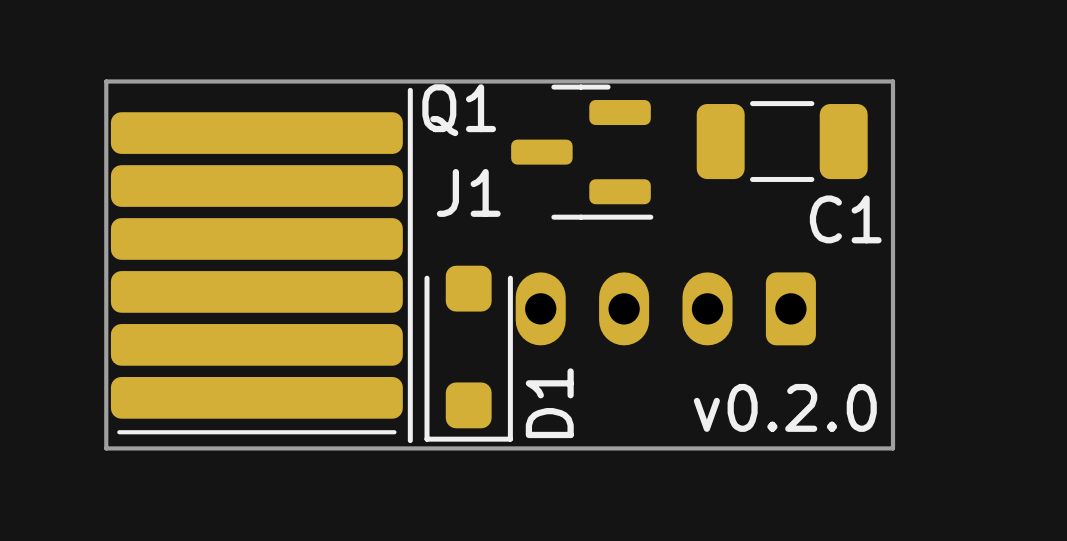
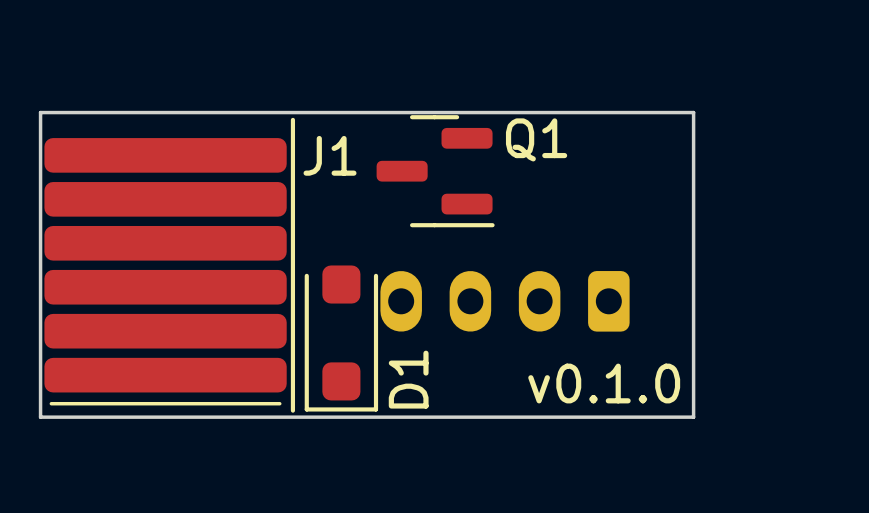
Q1 name position: Q1 (459, 110) -> Q1 (536, 139)
C1: (782, 141) -> none
J1 name position: J1 (468, 192) -> J1 (330, 155)
text: v0.2.0 (785, 407) -> v0.1.0 (604, 383)

